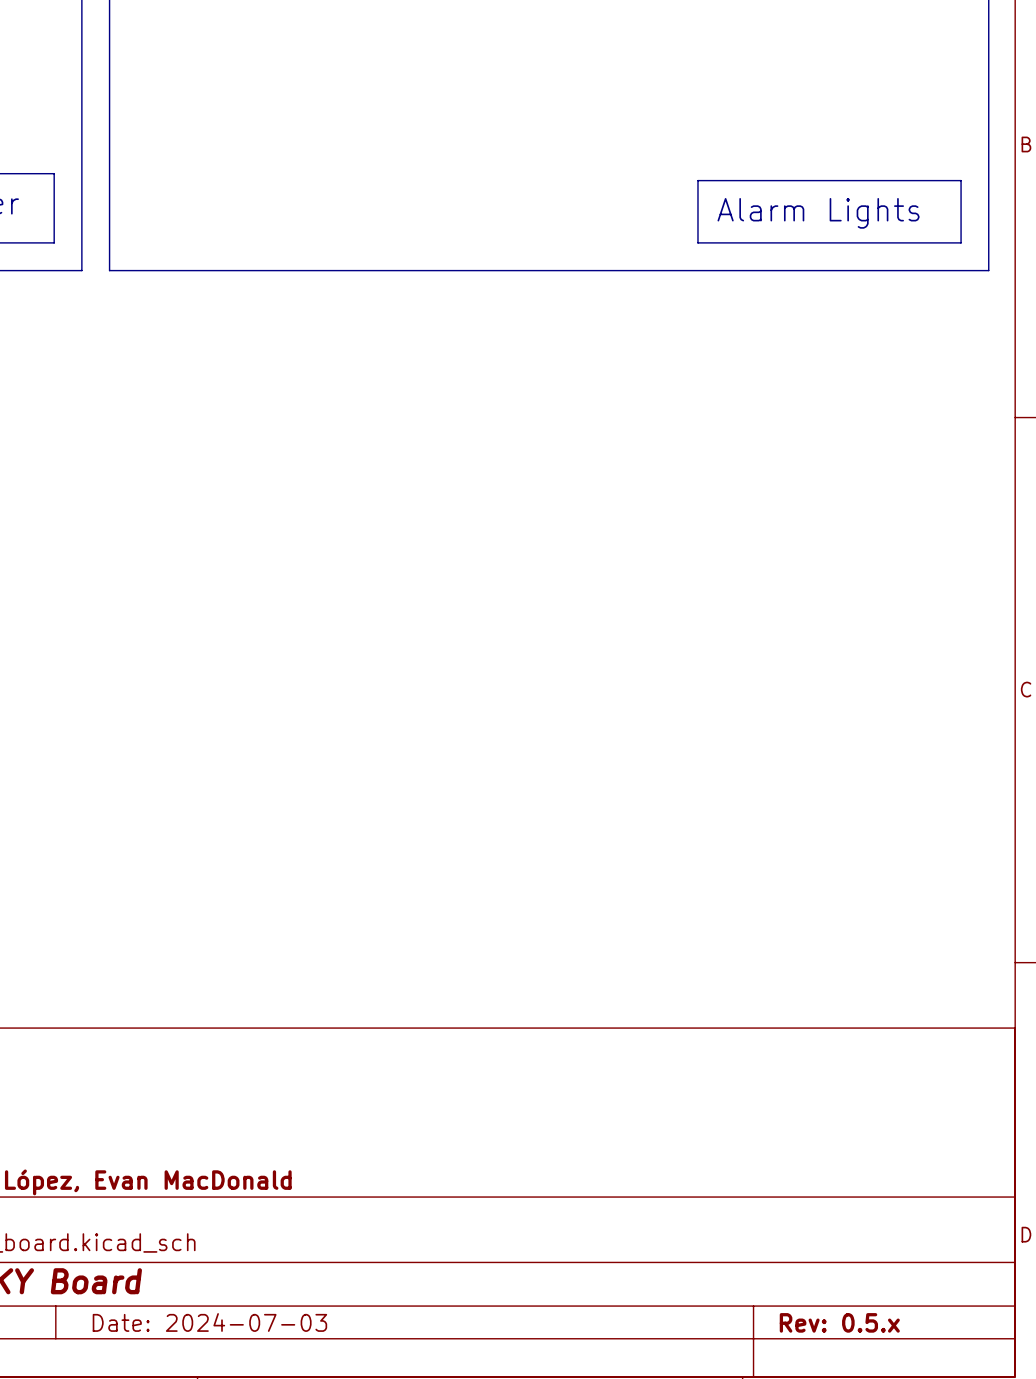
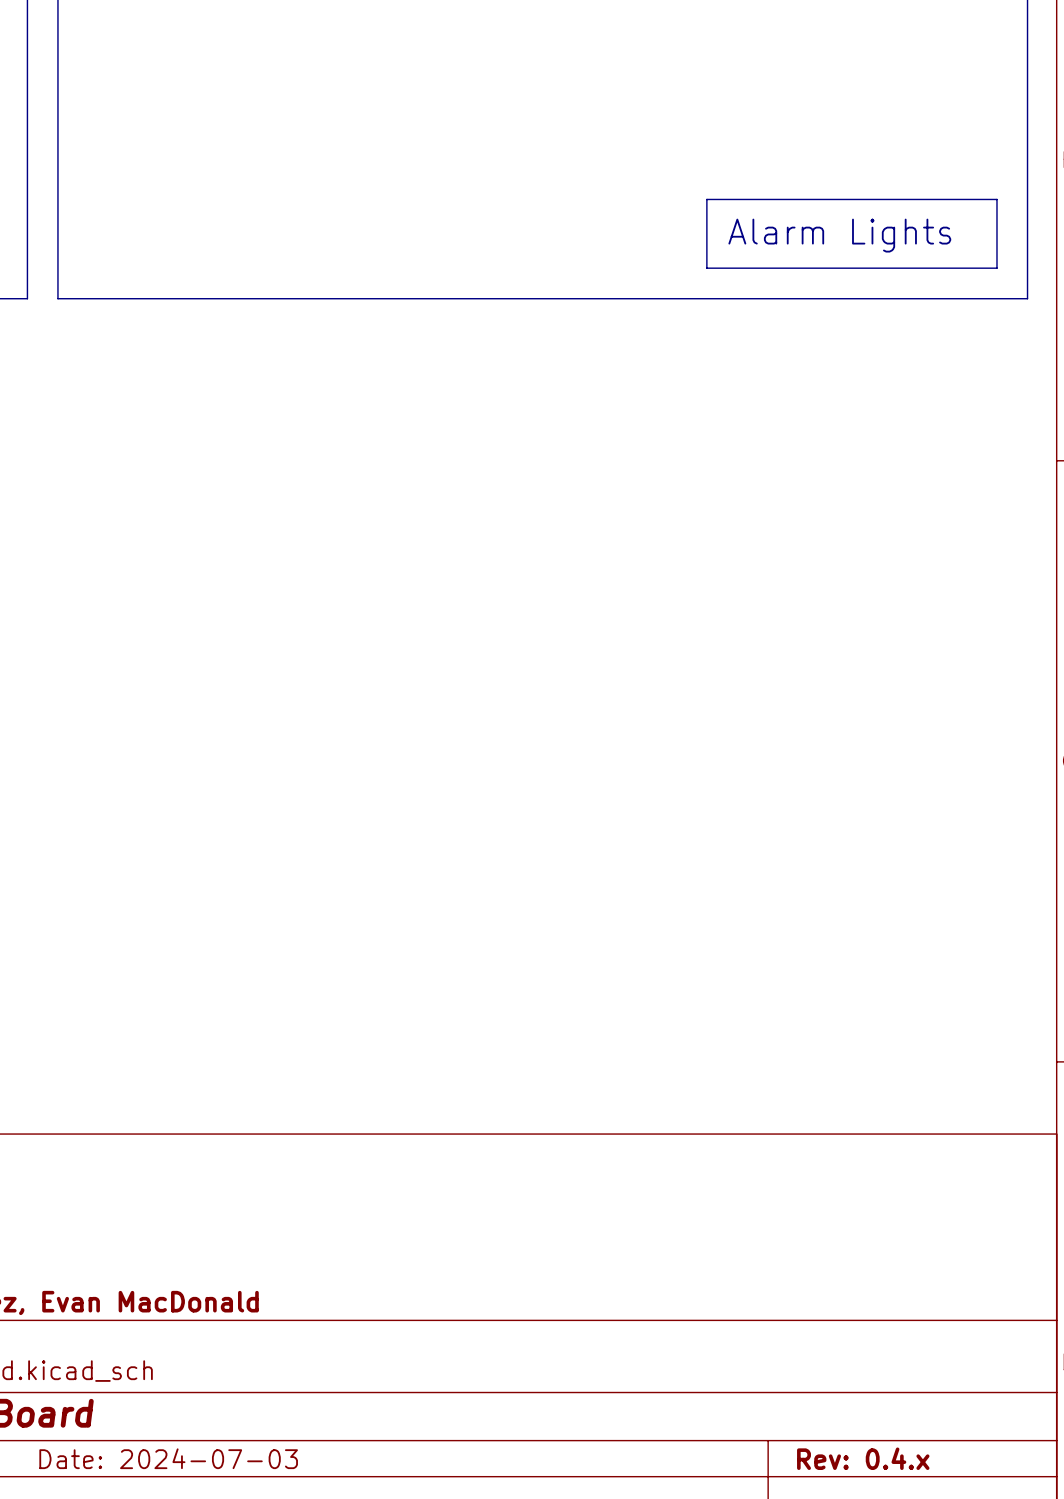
title block: Rev: 0.5.x (839, 1322) -> Rev: 0.4.x (863, 1458)

